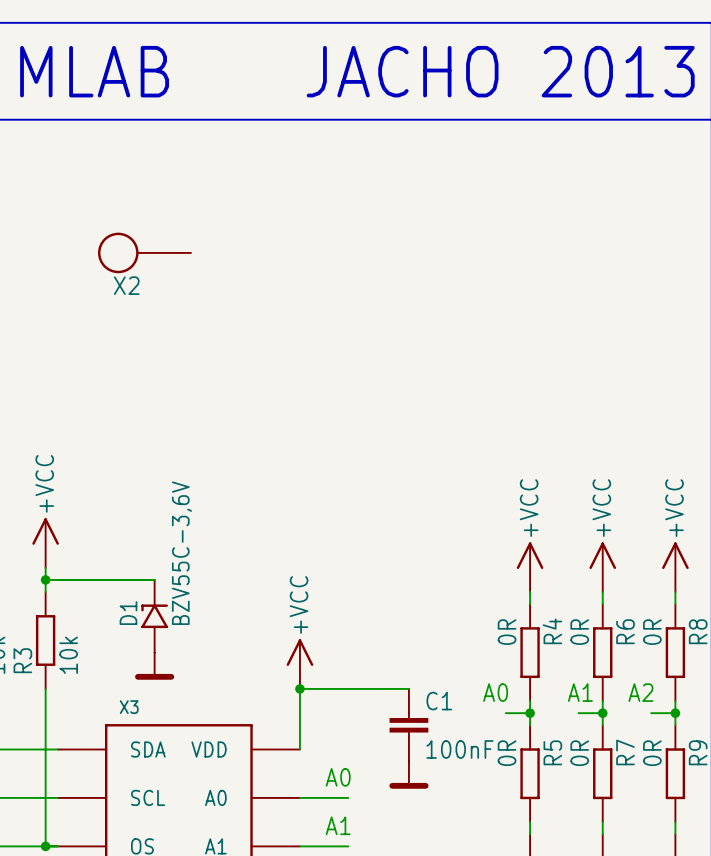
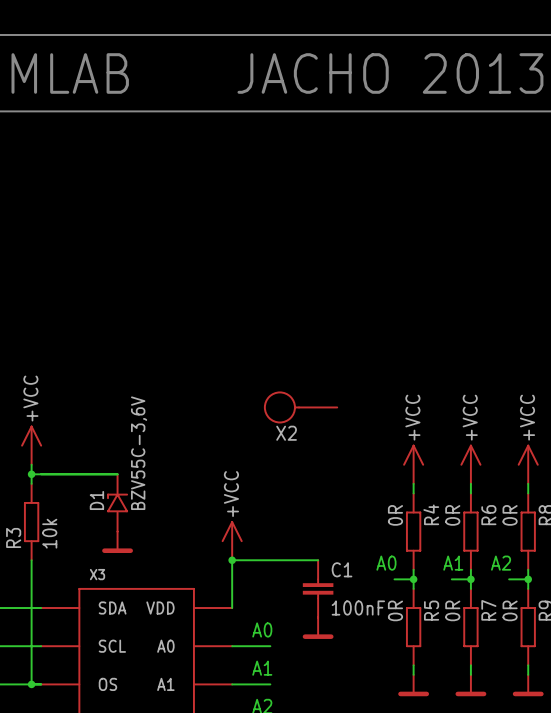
X2 position: (144, 252) -> (300, 407)

